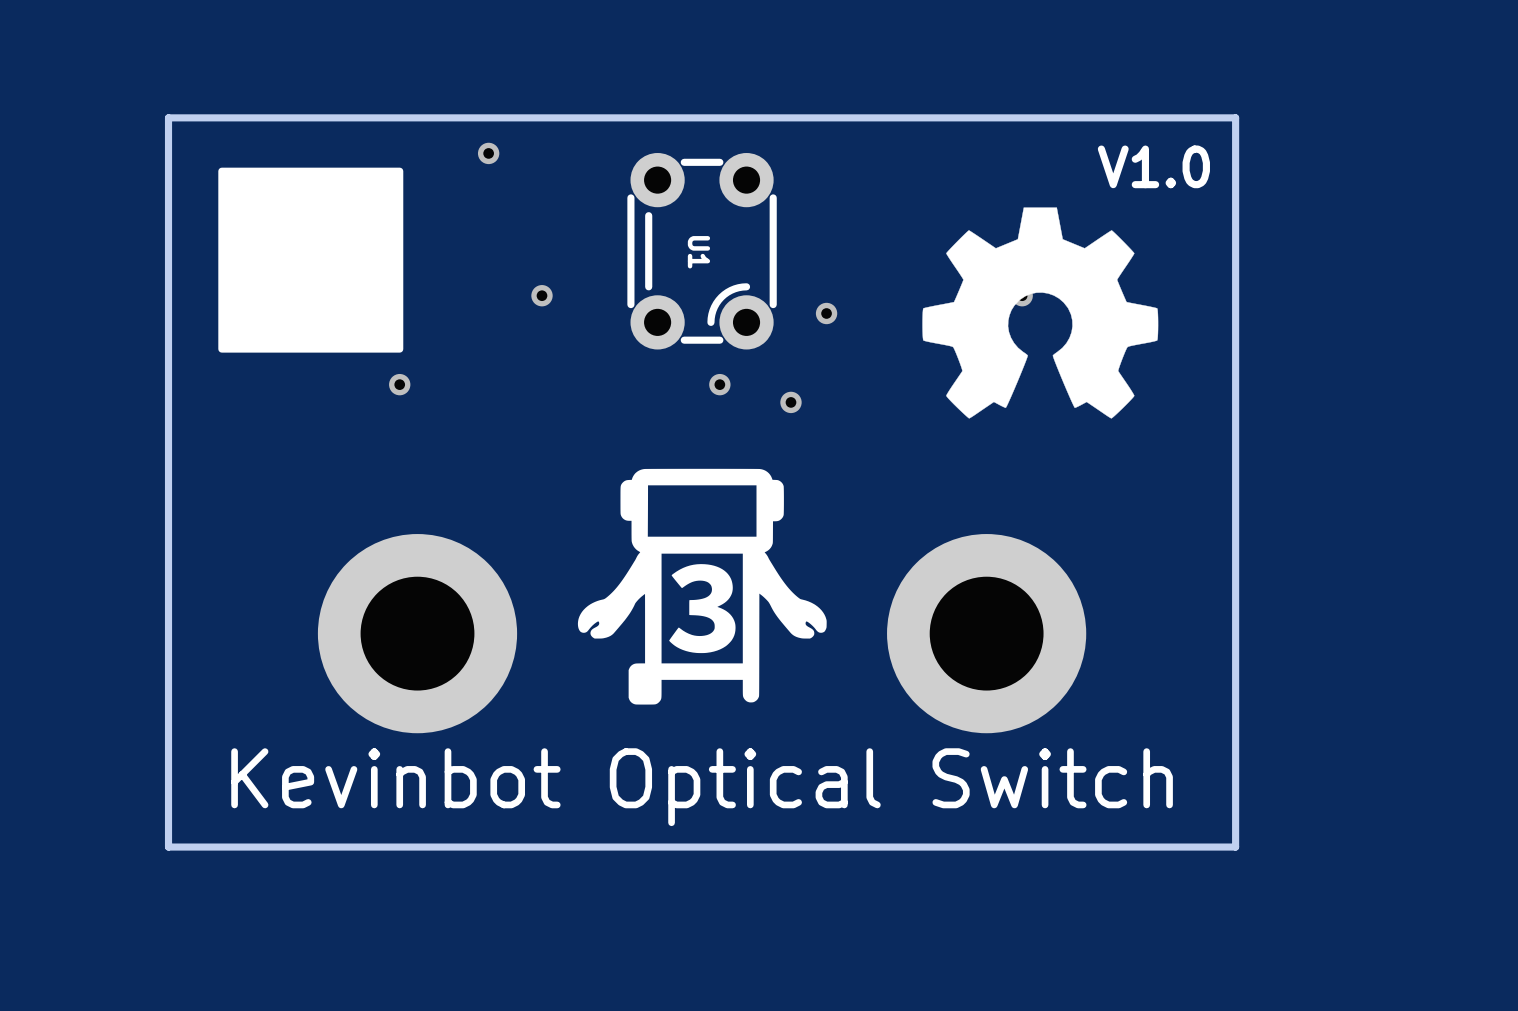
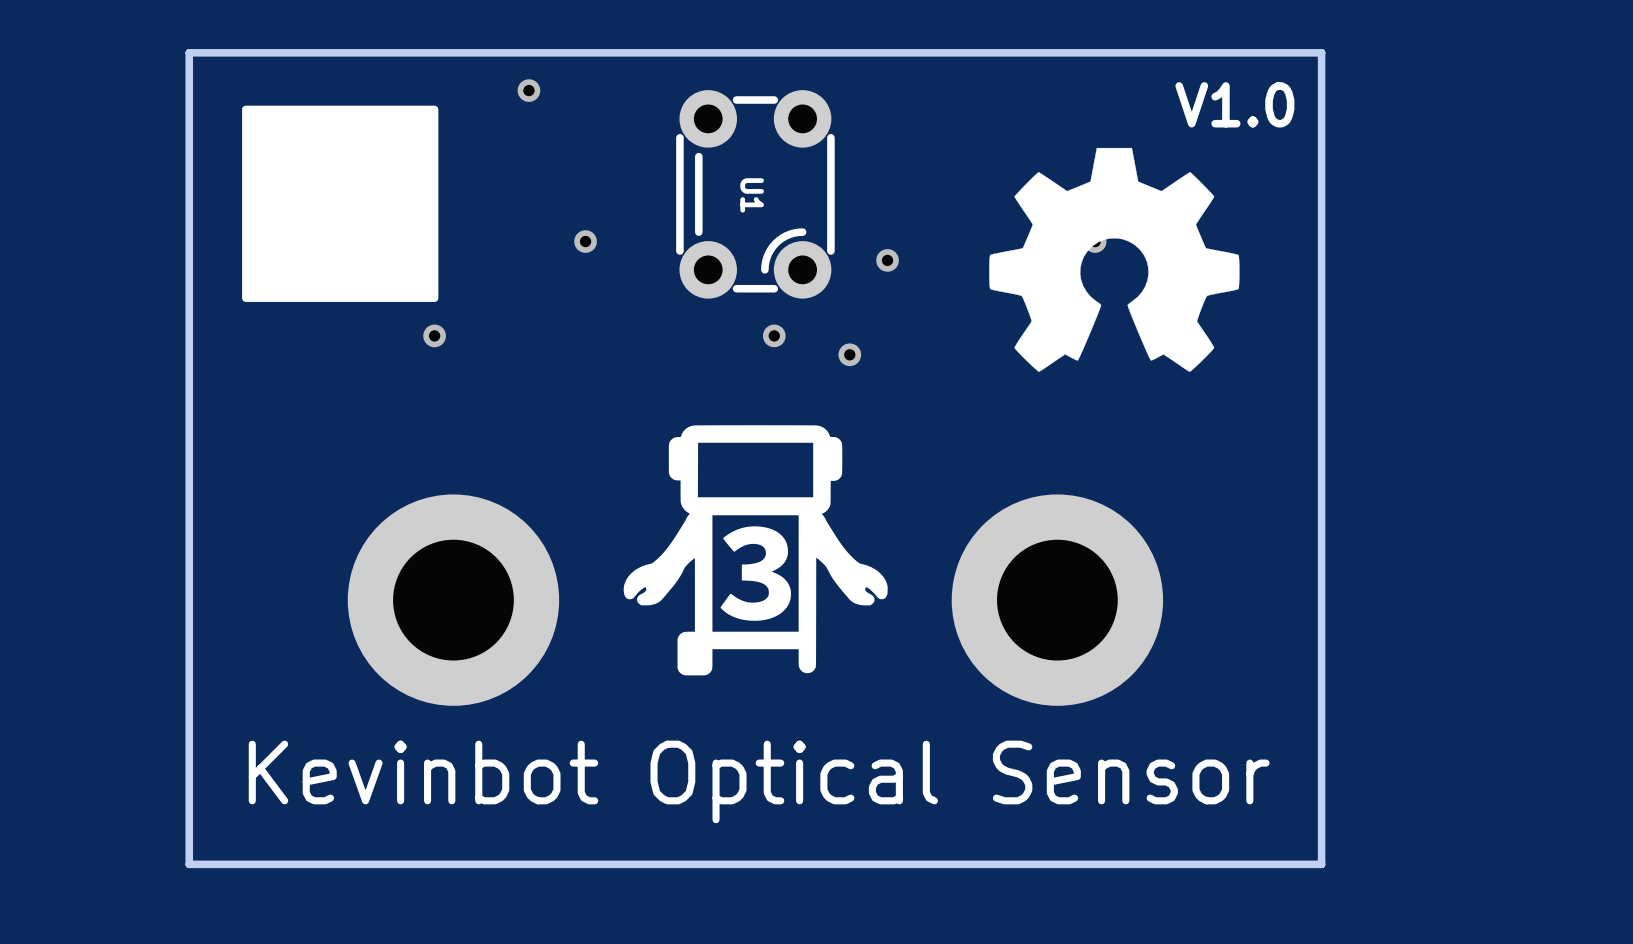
text: Kevinbot Optical Switch (702, 787) -> Kevinbot Optical Sensor (759, 781)
board edge: (1235, 847) (168, 847) -> (1321, 826) (1321, 864) (189, 864) (189, 826)

